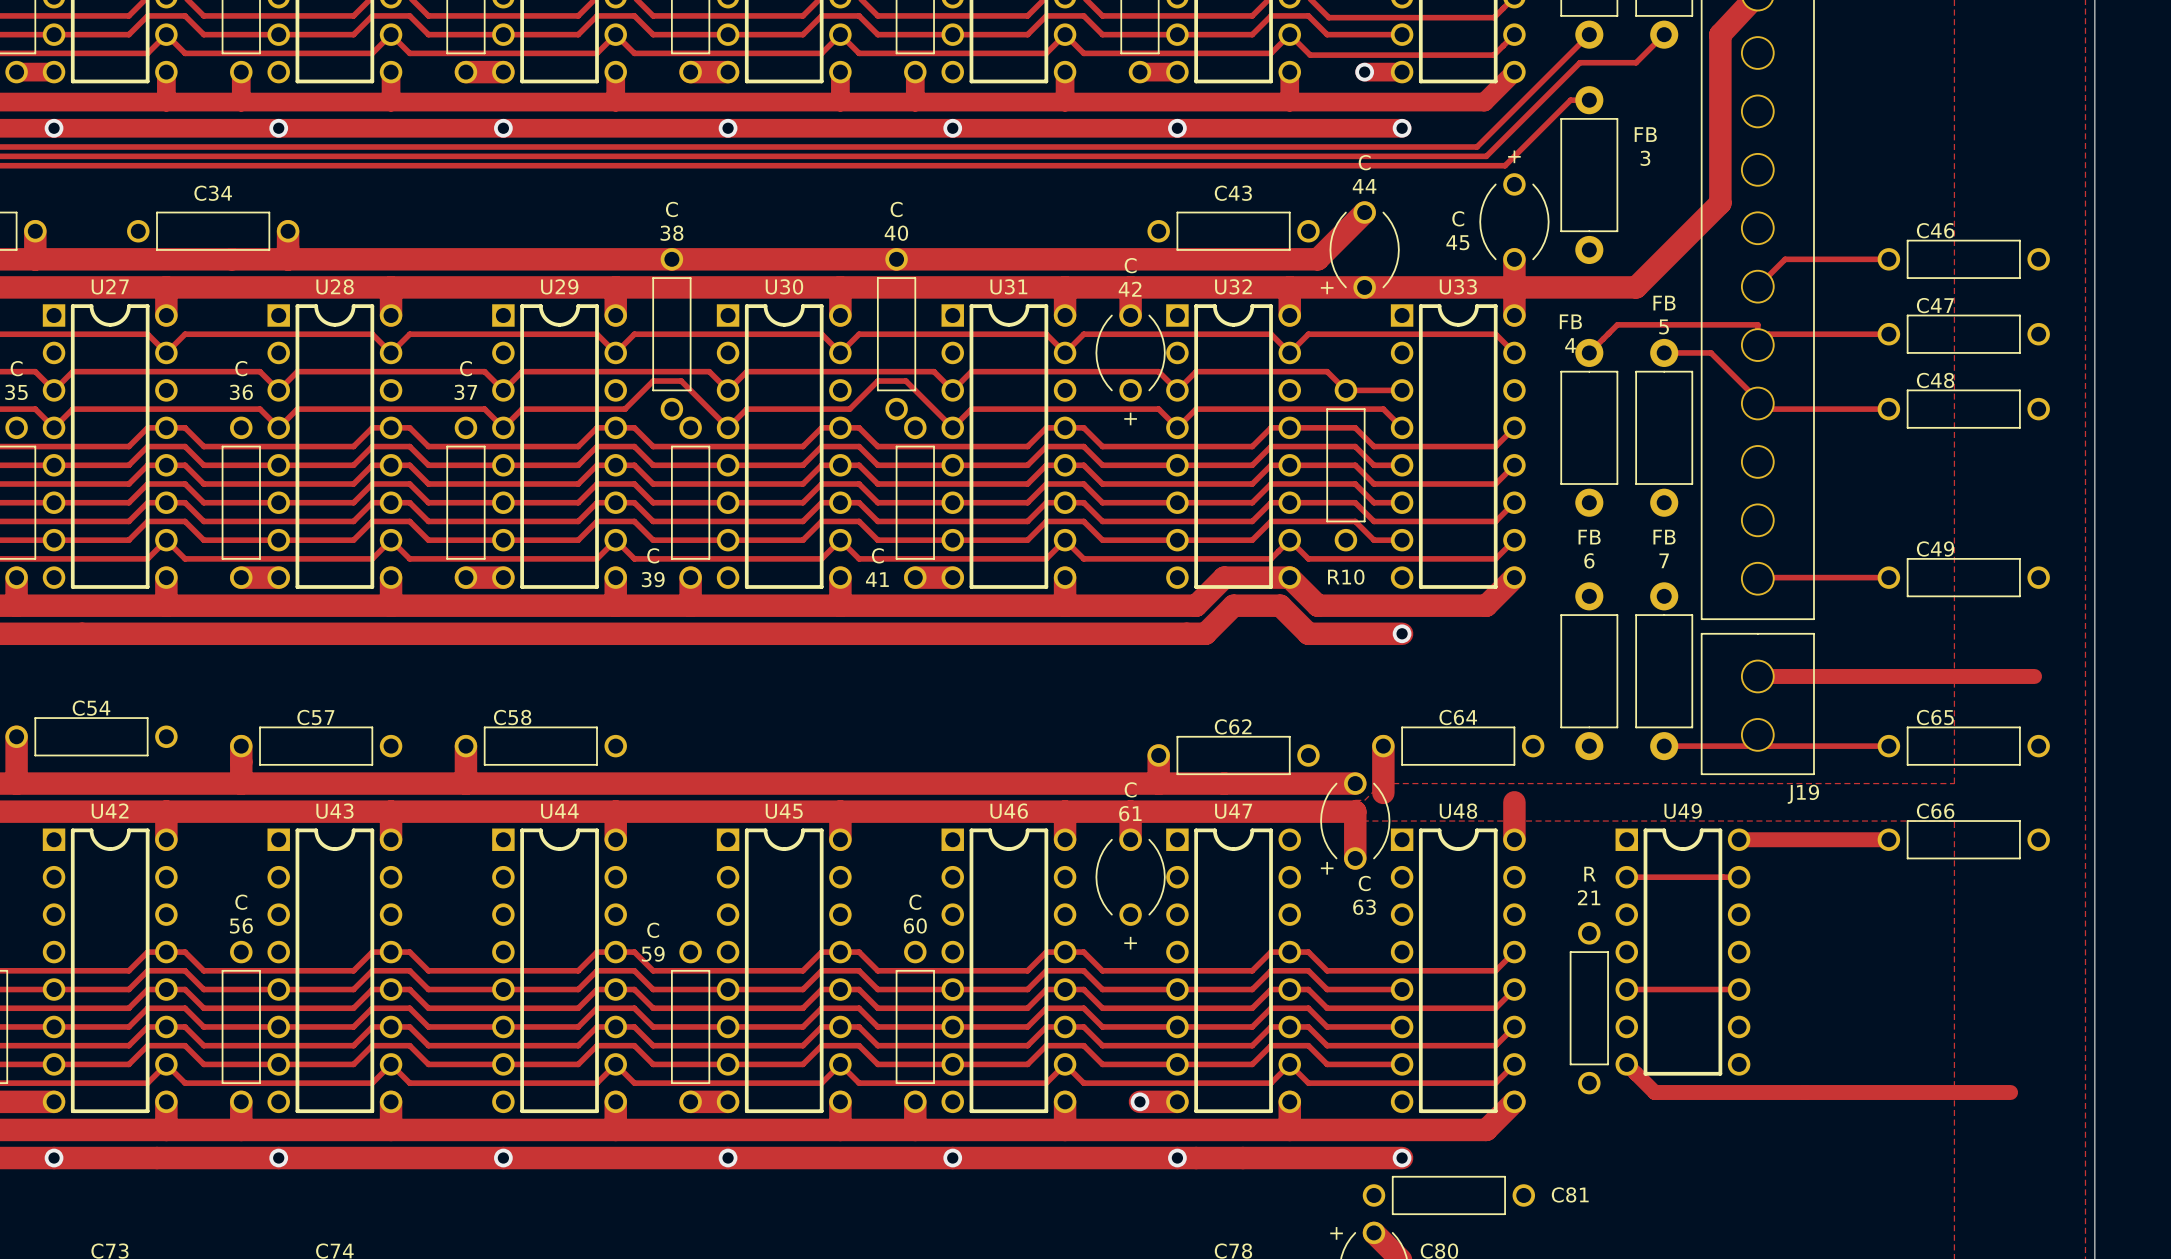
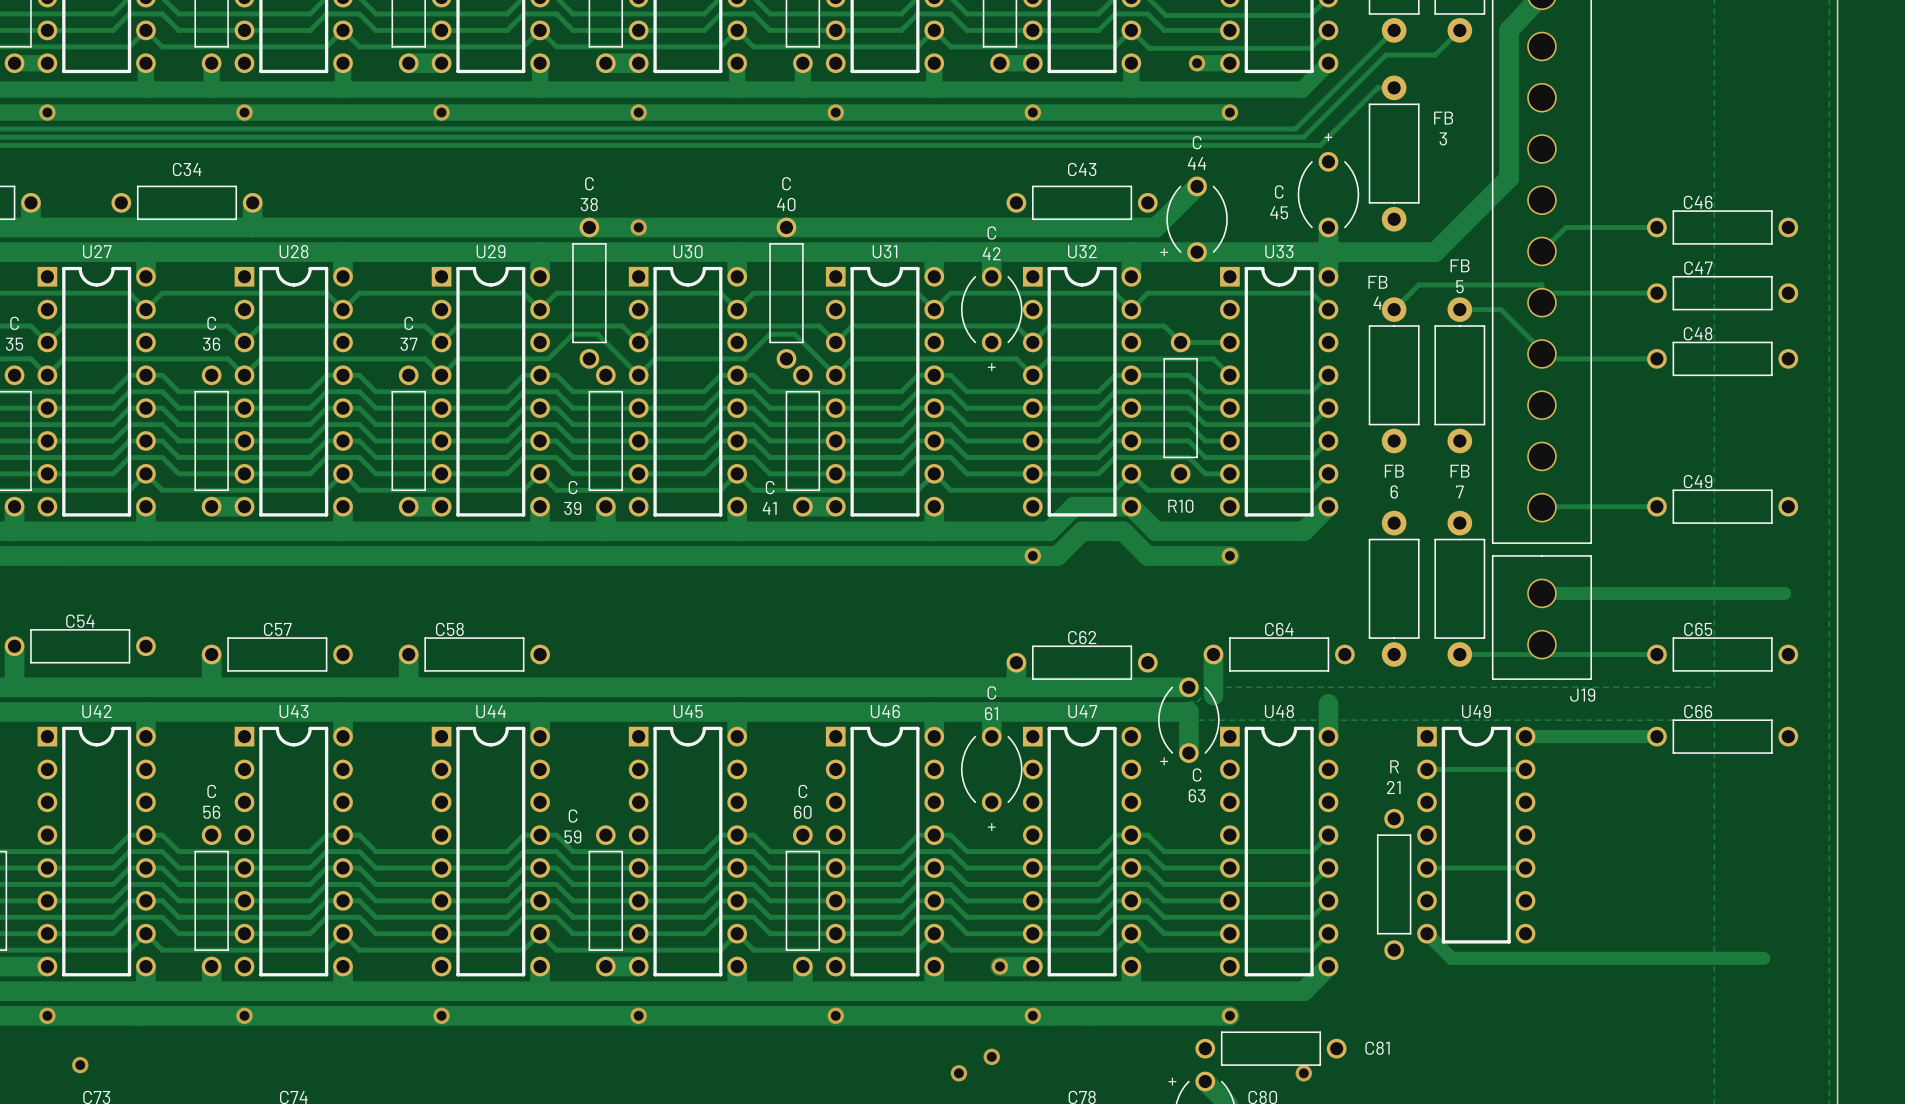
via: none -> (638, 227)
via: none -> (1032, 555)
via: none -> (991, 1056)
via: none -> (80, 1065)
via: none -> (958, 1073)
via: none -> (1303, 1073)

